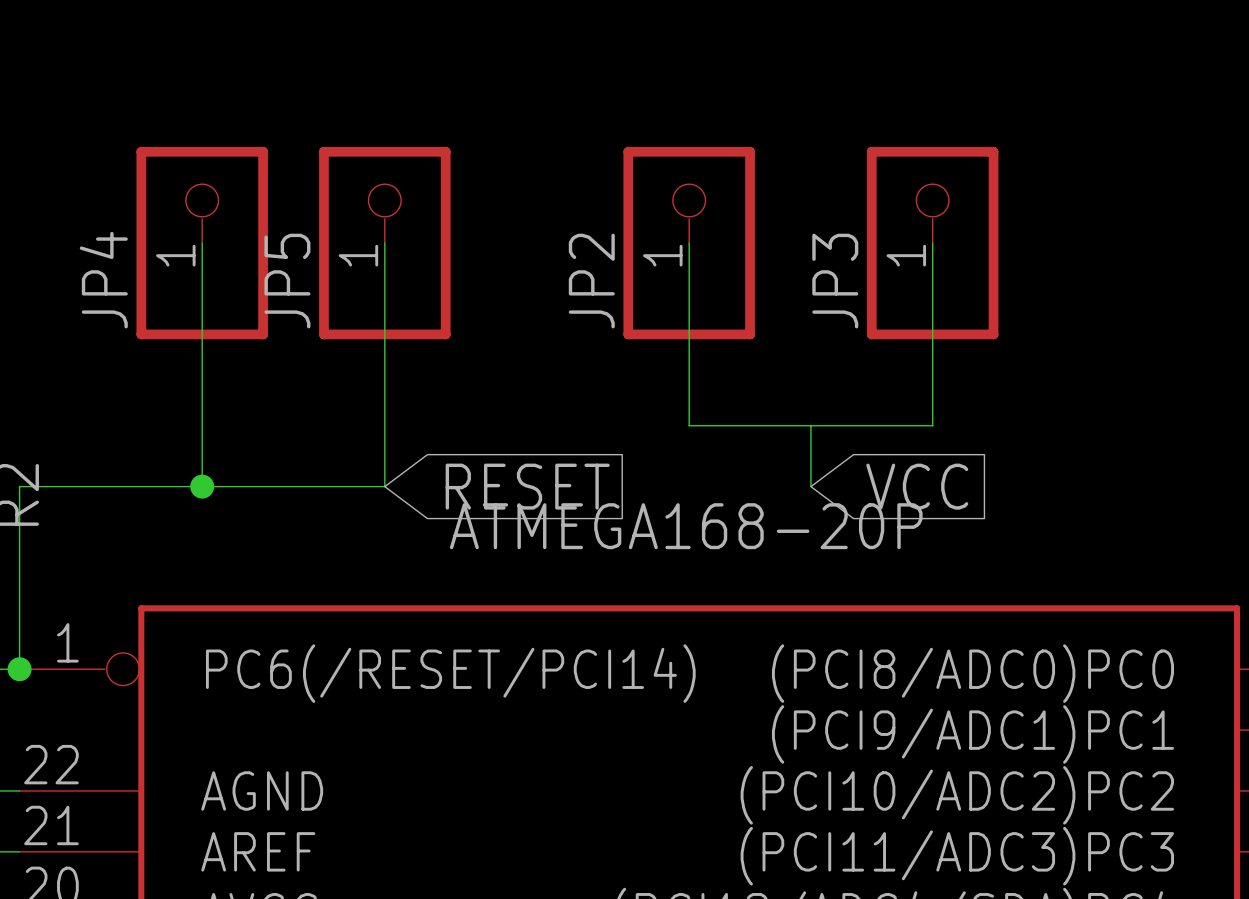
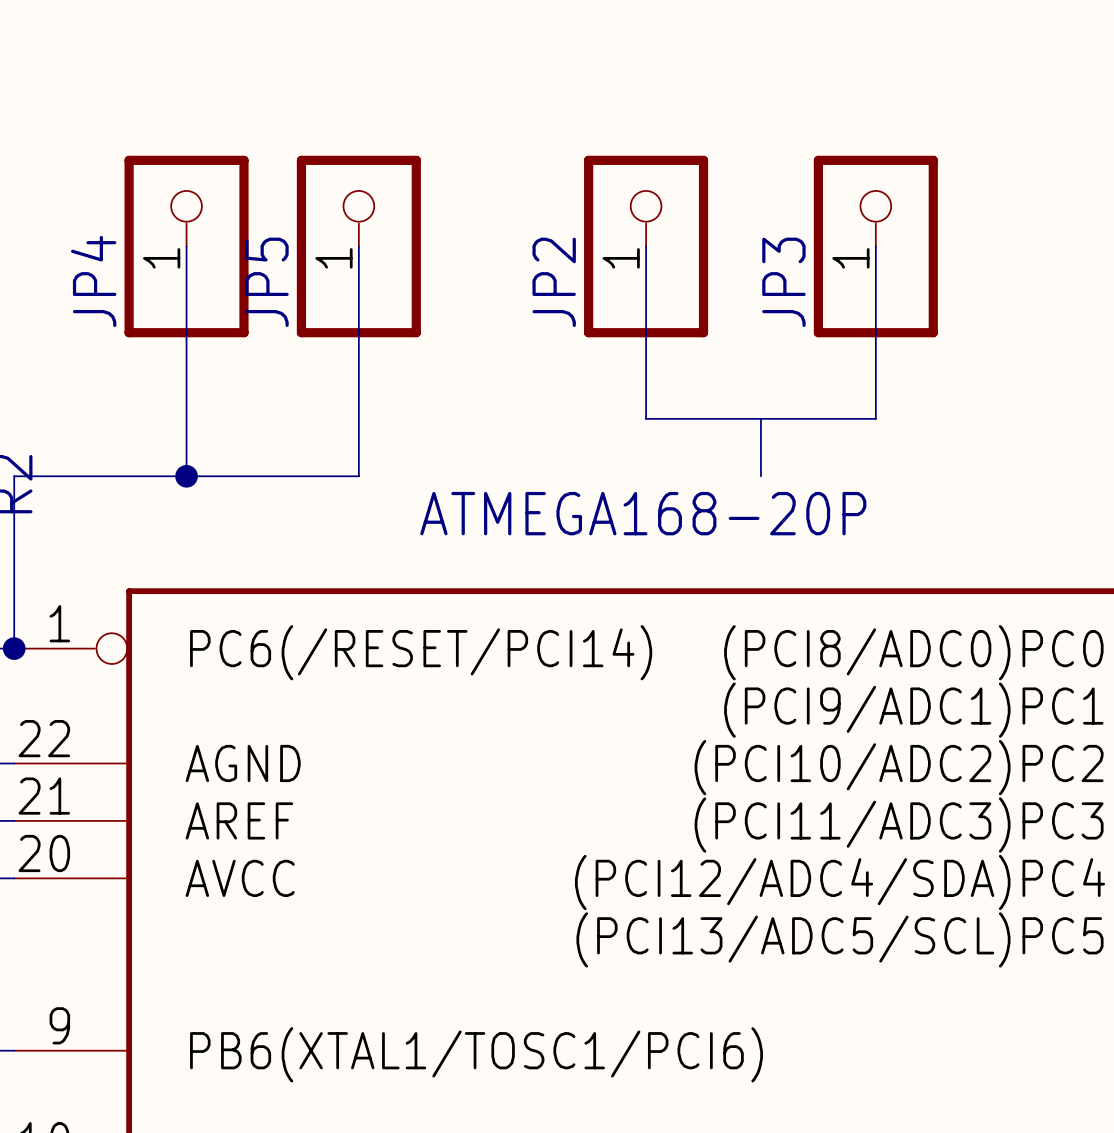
global label: RESET (527, 486) -> none
global label: VCC (917, 486) -> none

